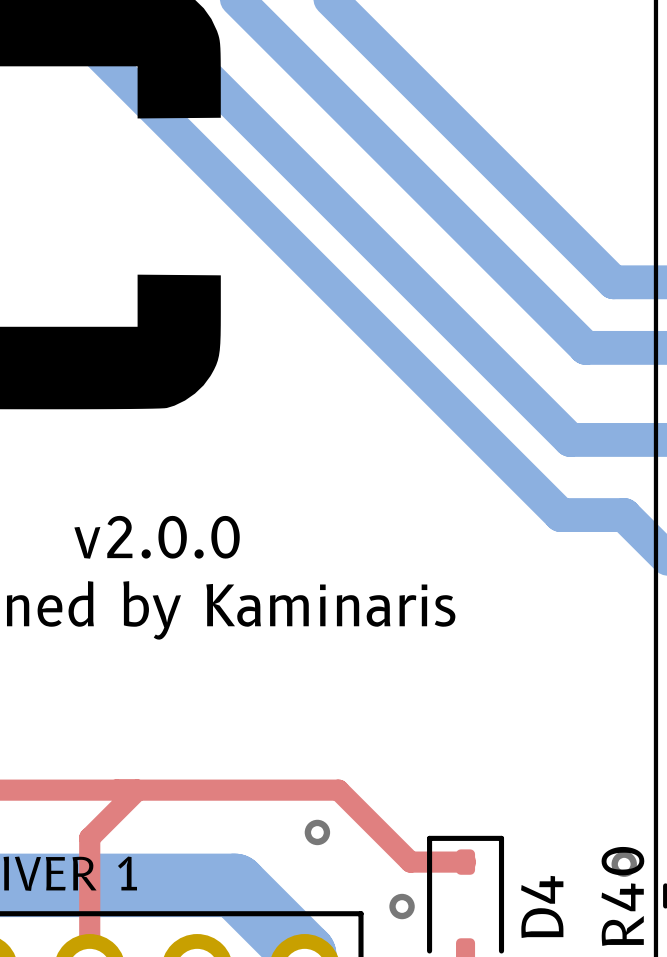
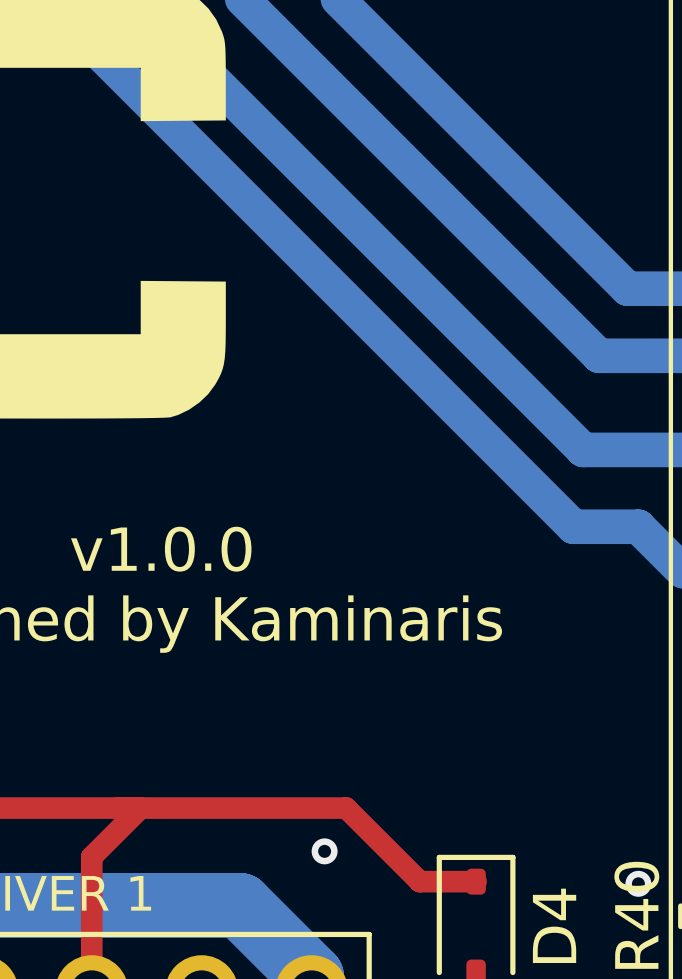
text: v2.0.0 (157, 537) -> v1.0.0 (161, 549)
via: (402, 906) -> none

